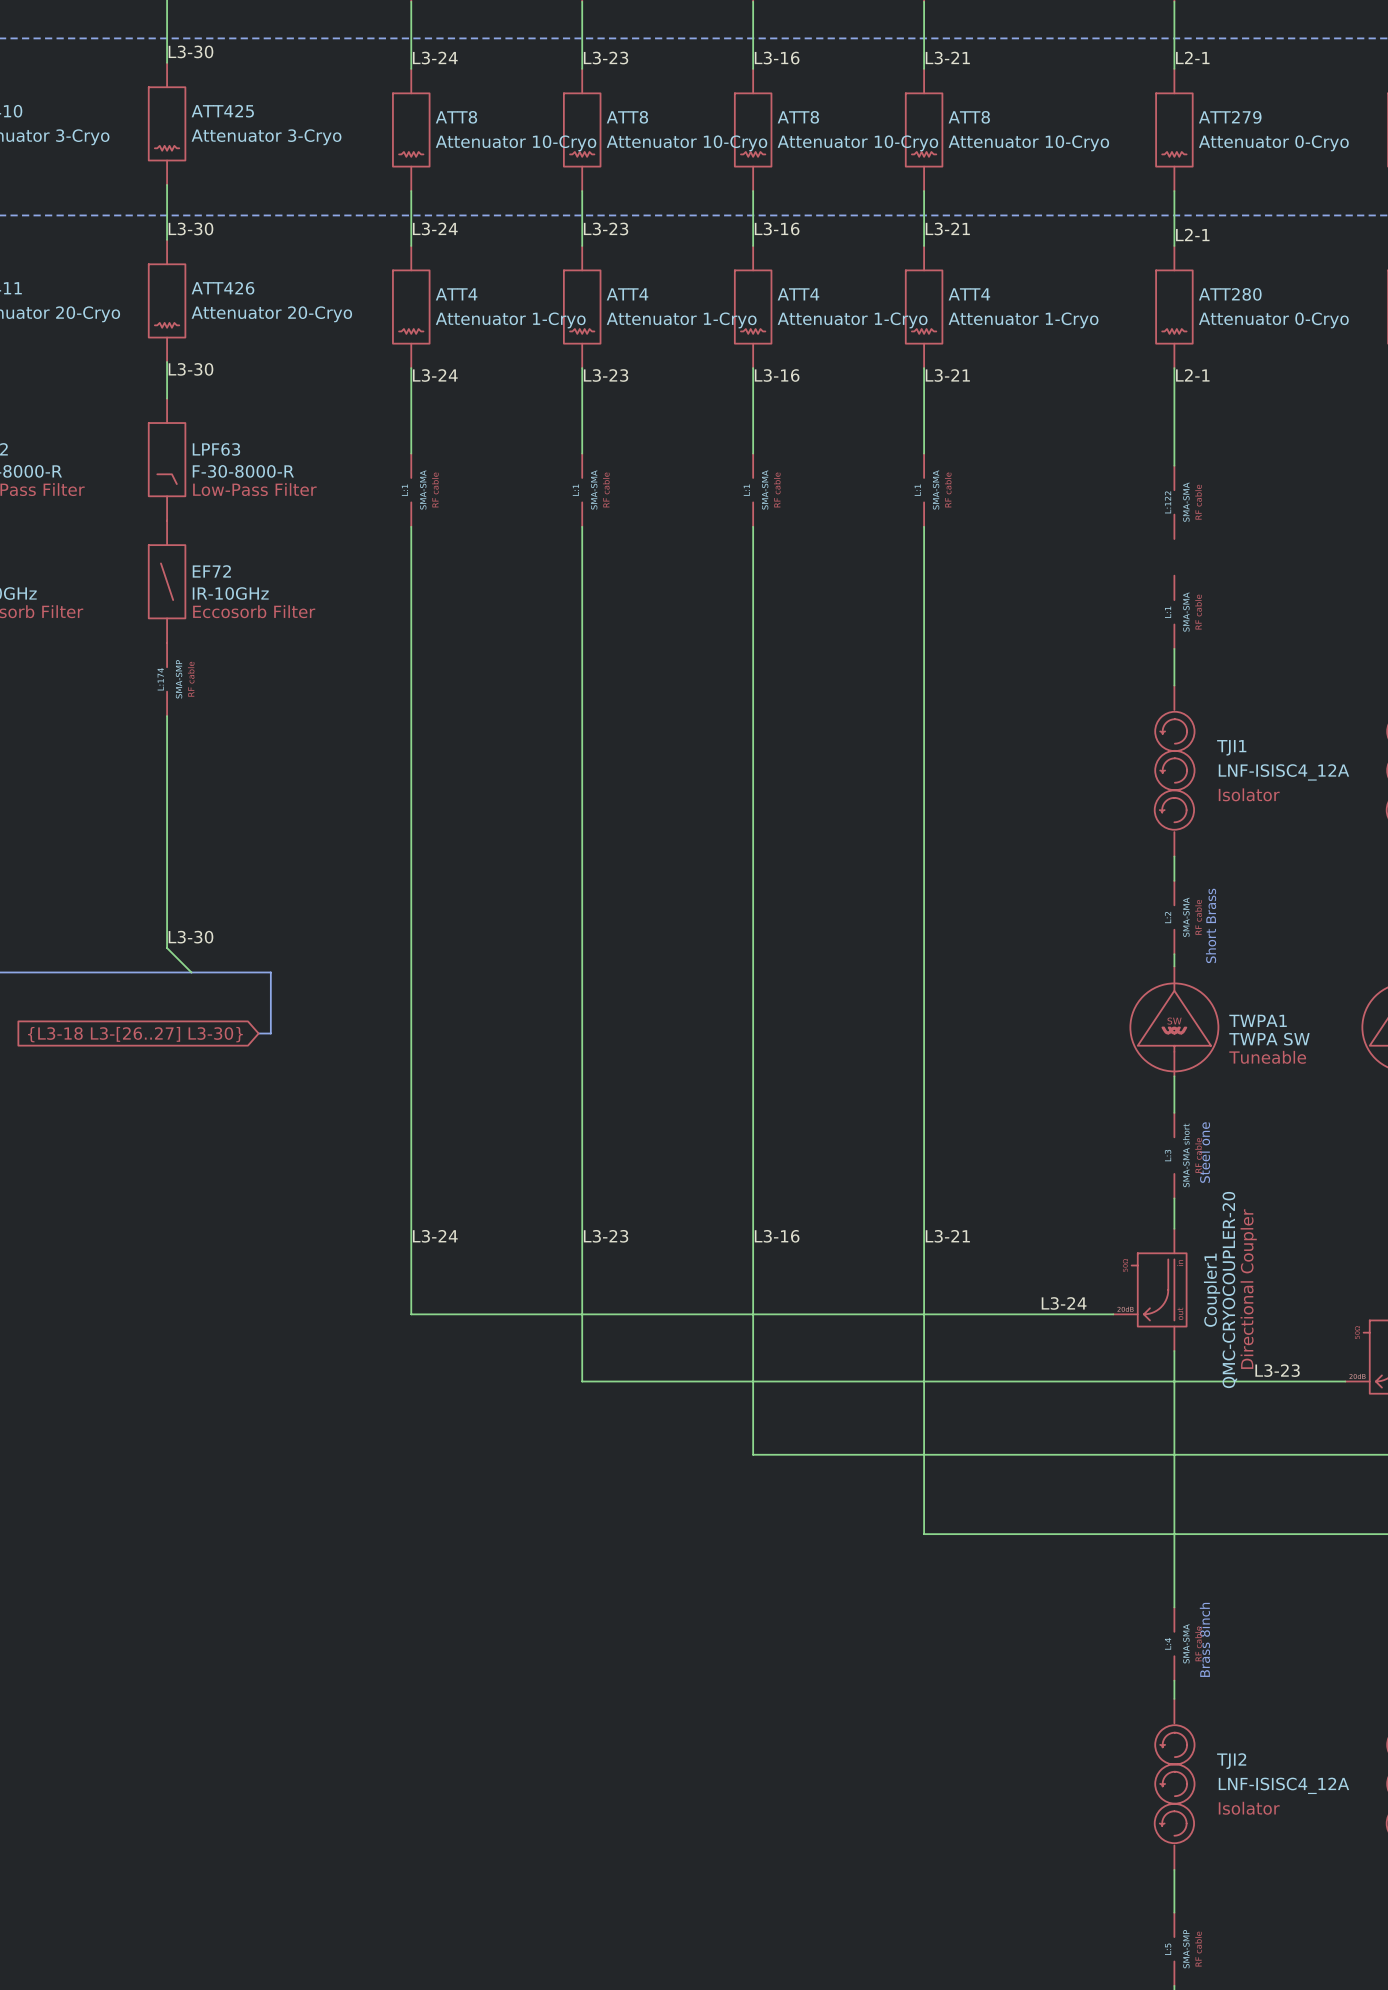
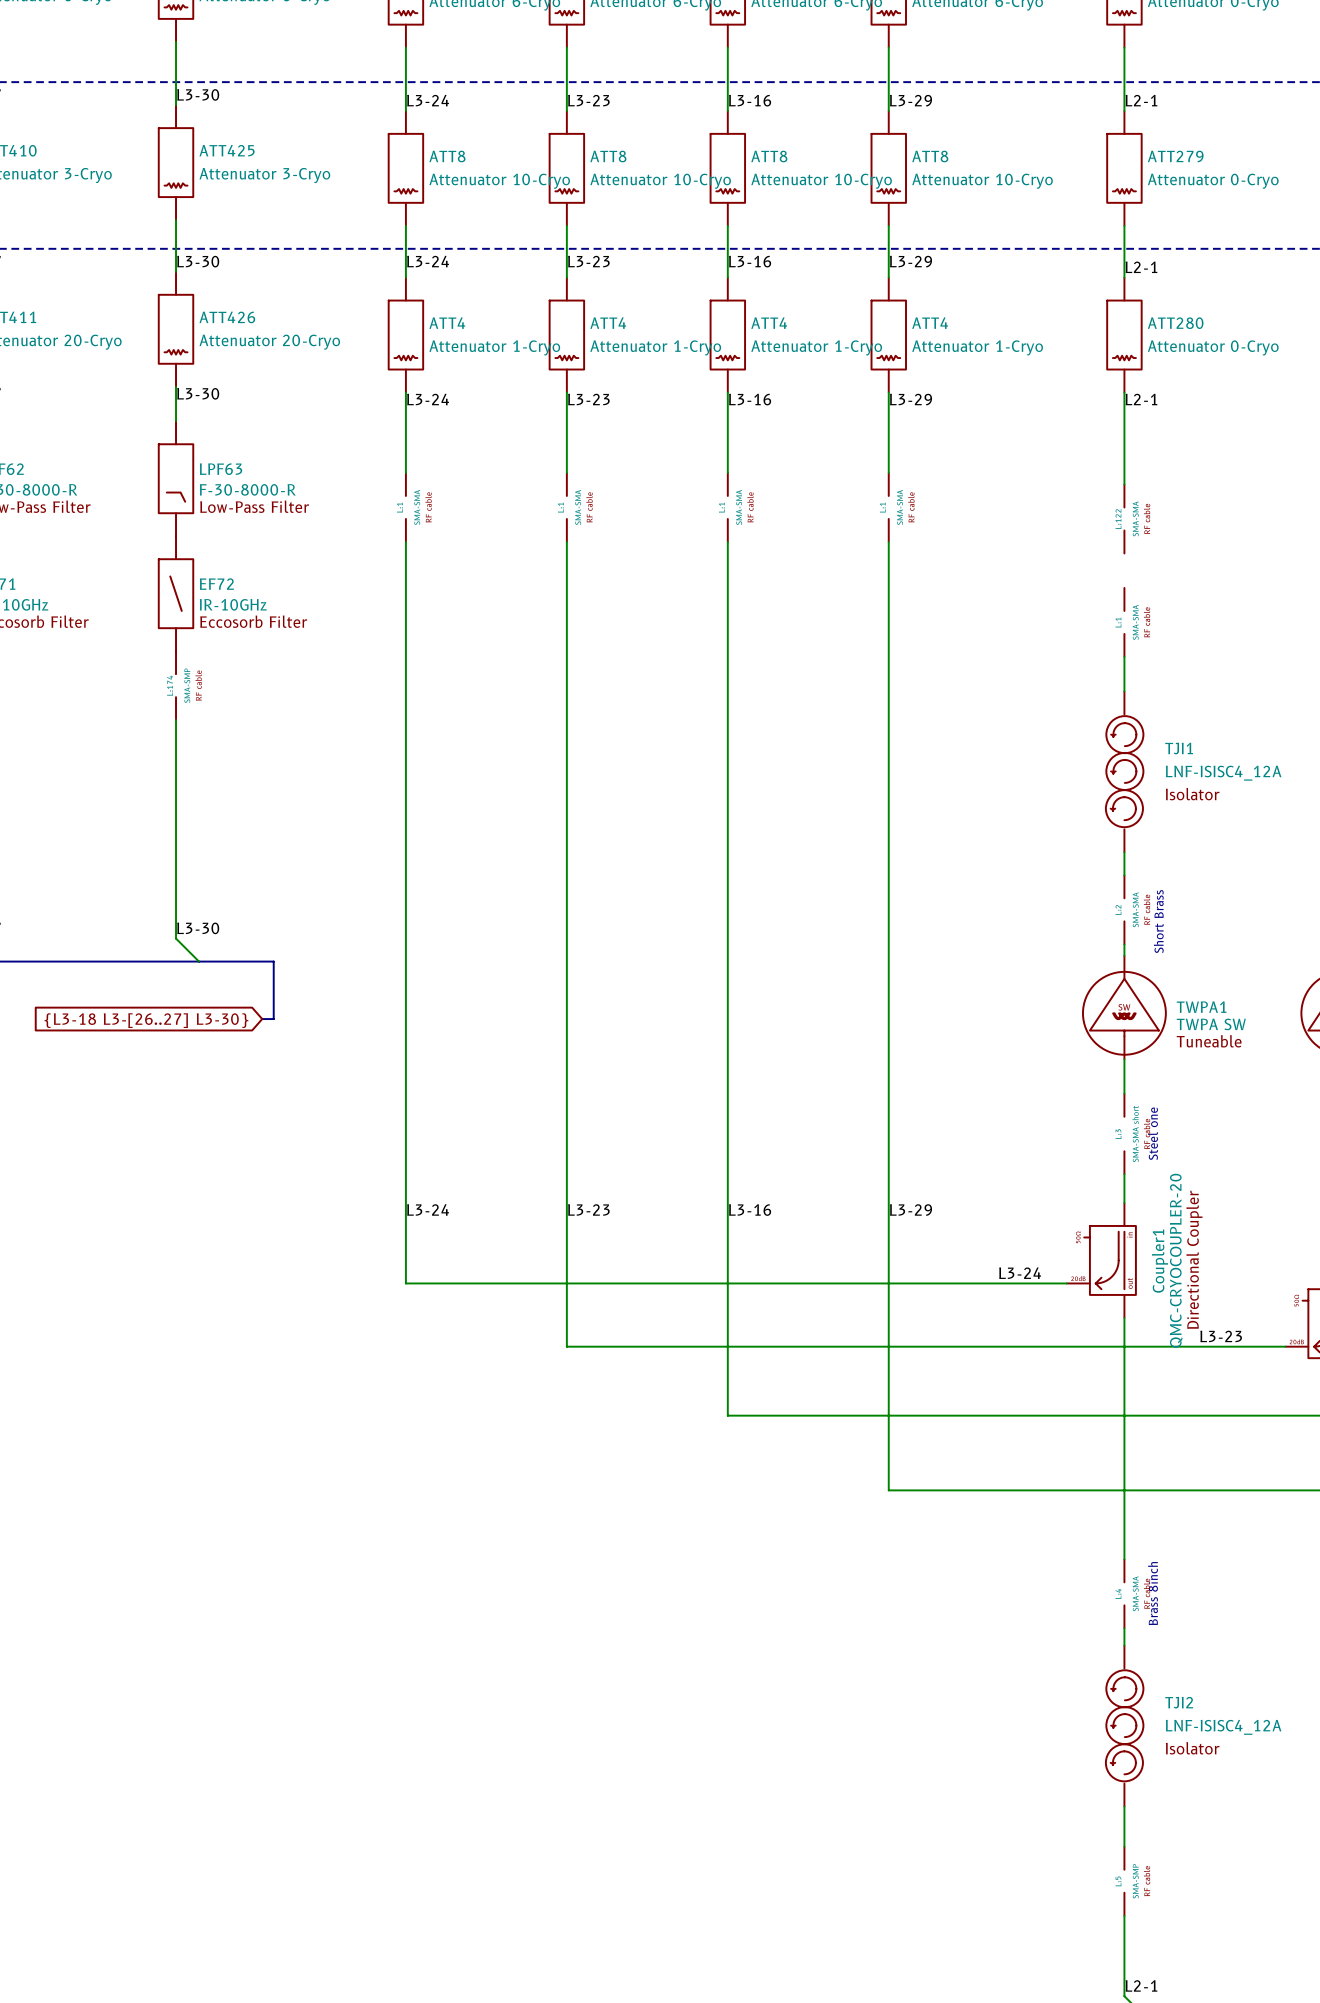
label: L3-21 (947, 58) -> L3-29 (911, 100)
label: L3-21 (947, 228) -> L3-29 (911, 261)
label: L3-21 (947, 375) -> L3-29 (911, 399)
label: L3-21 (947, 1236) -> L3-29 (911, 1210)

